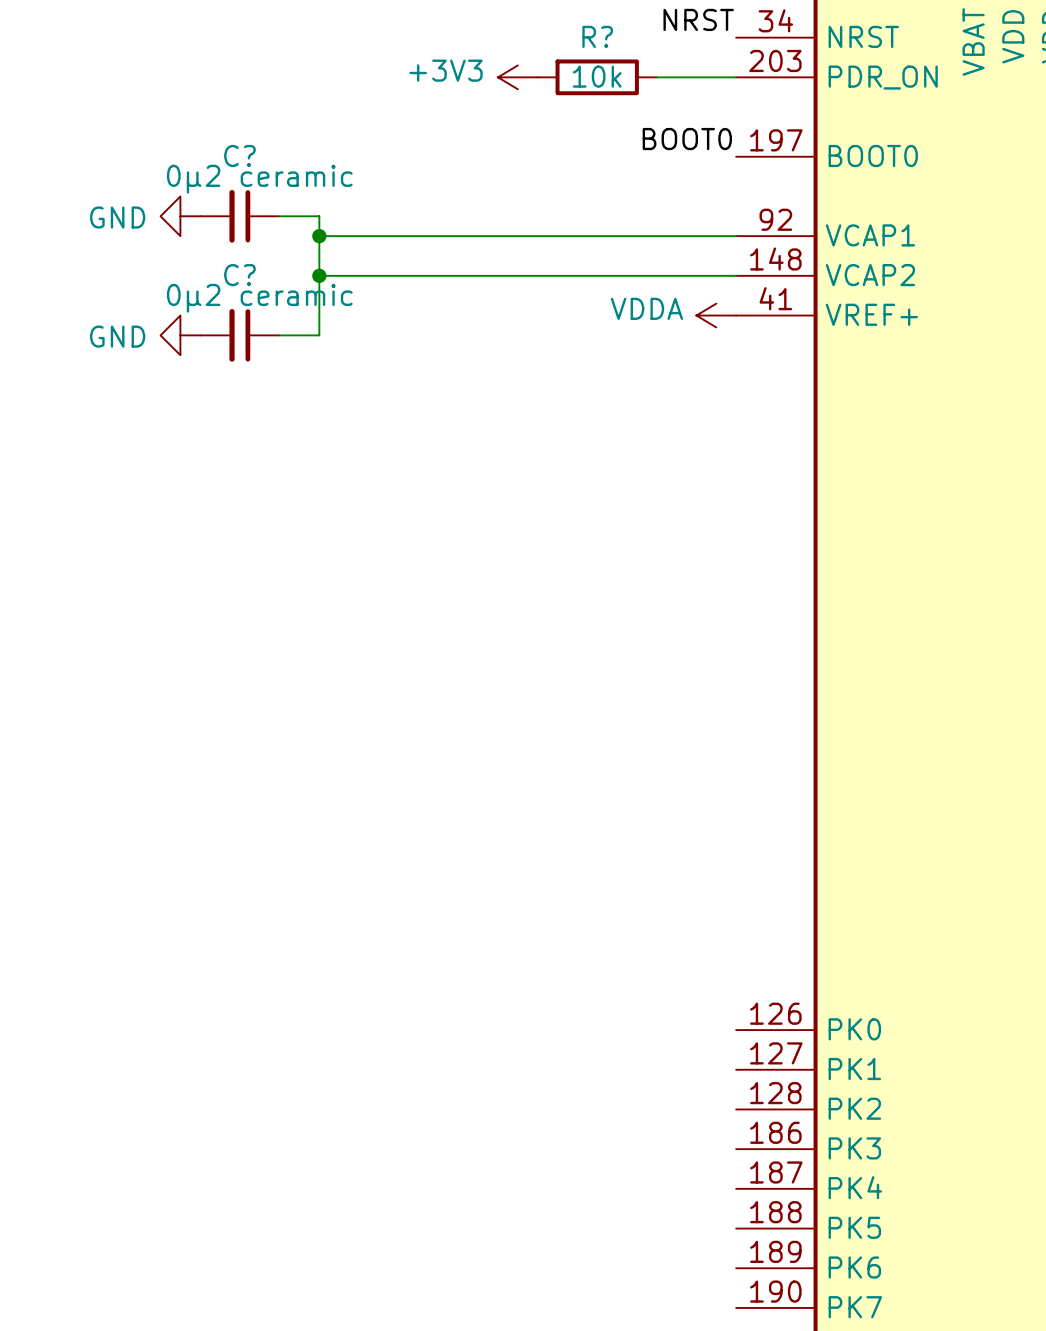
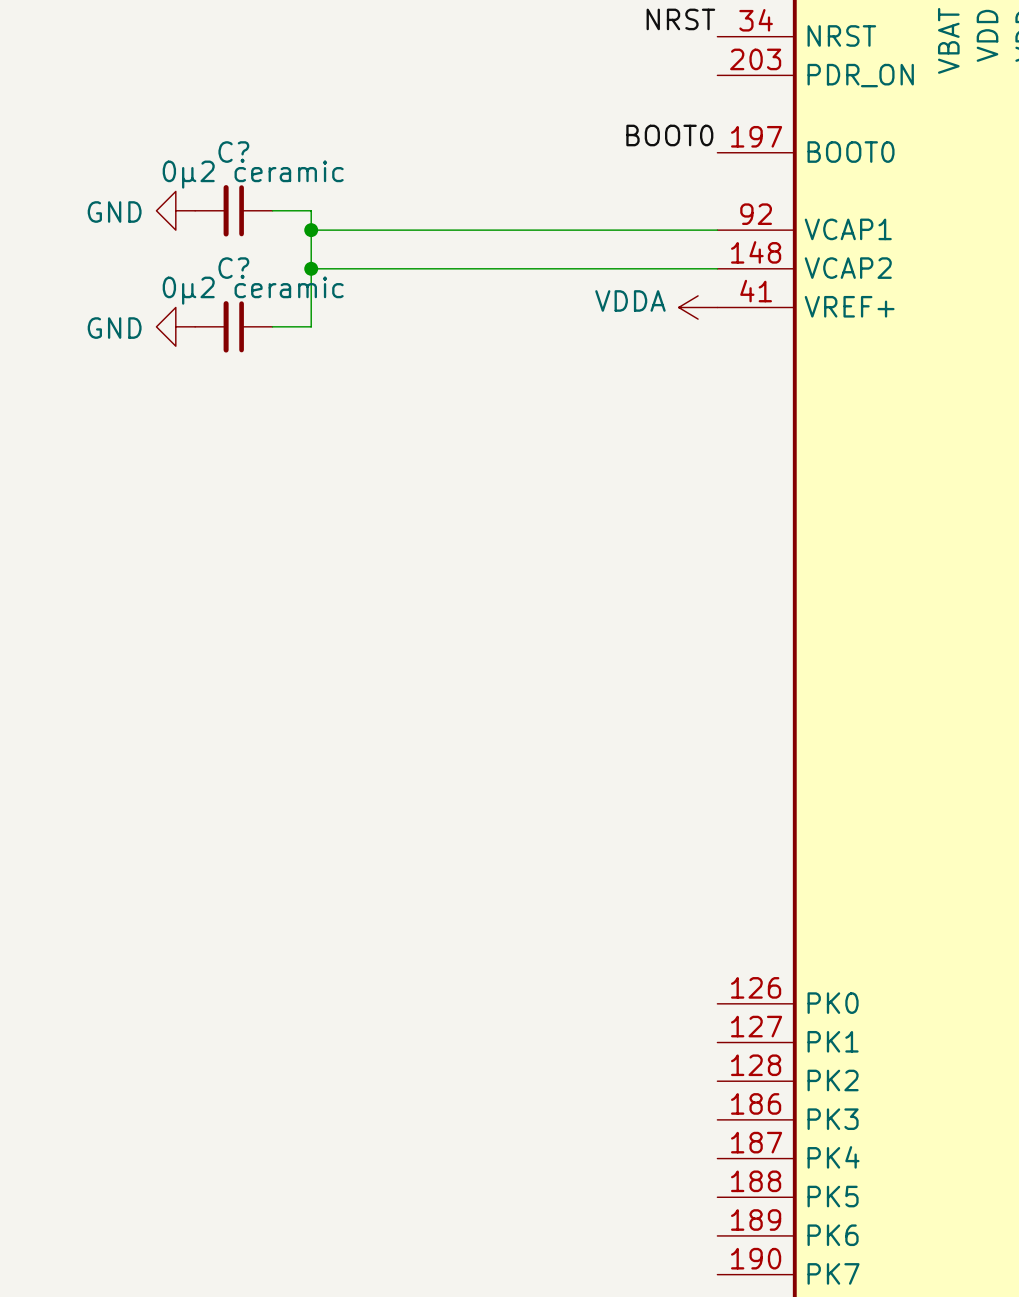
power symbol: +3V3 (517, 77) -> none
R?: 10k (597, 77) -> none
wire: (656, 77) (736, 77) -> none

